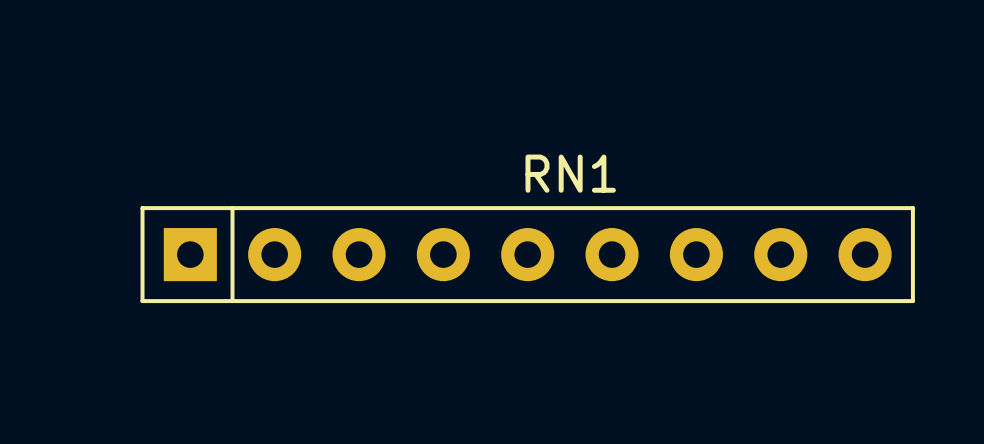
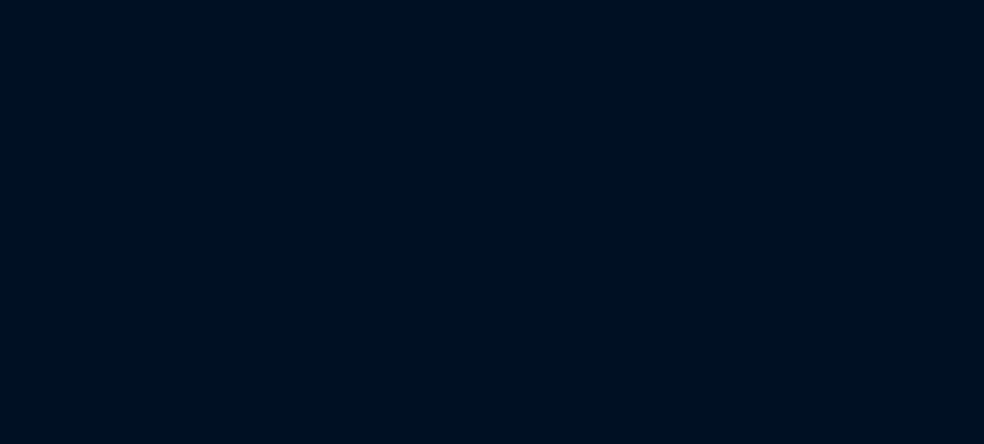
RN1: (527, 254) -> none

